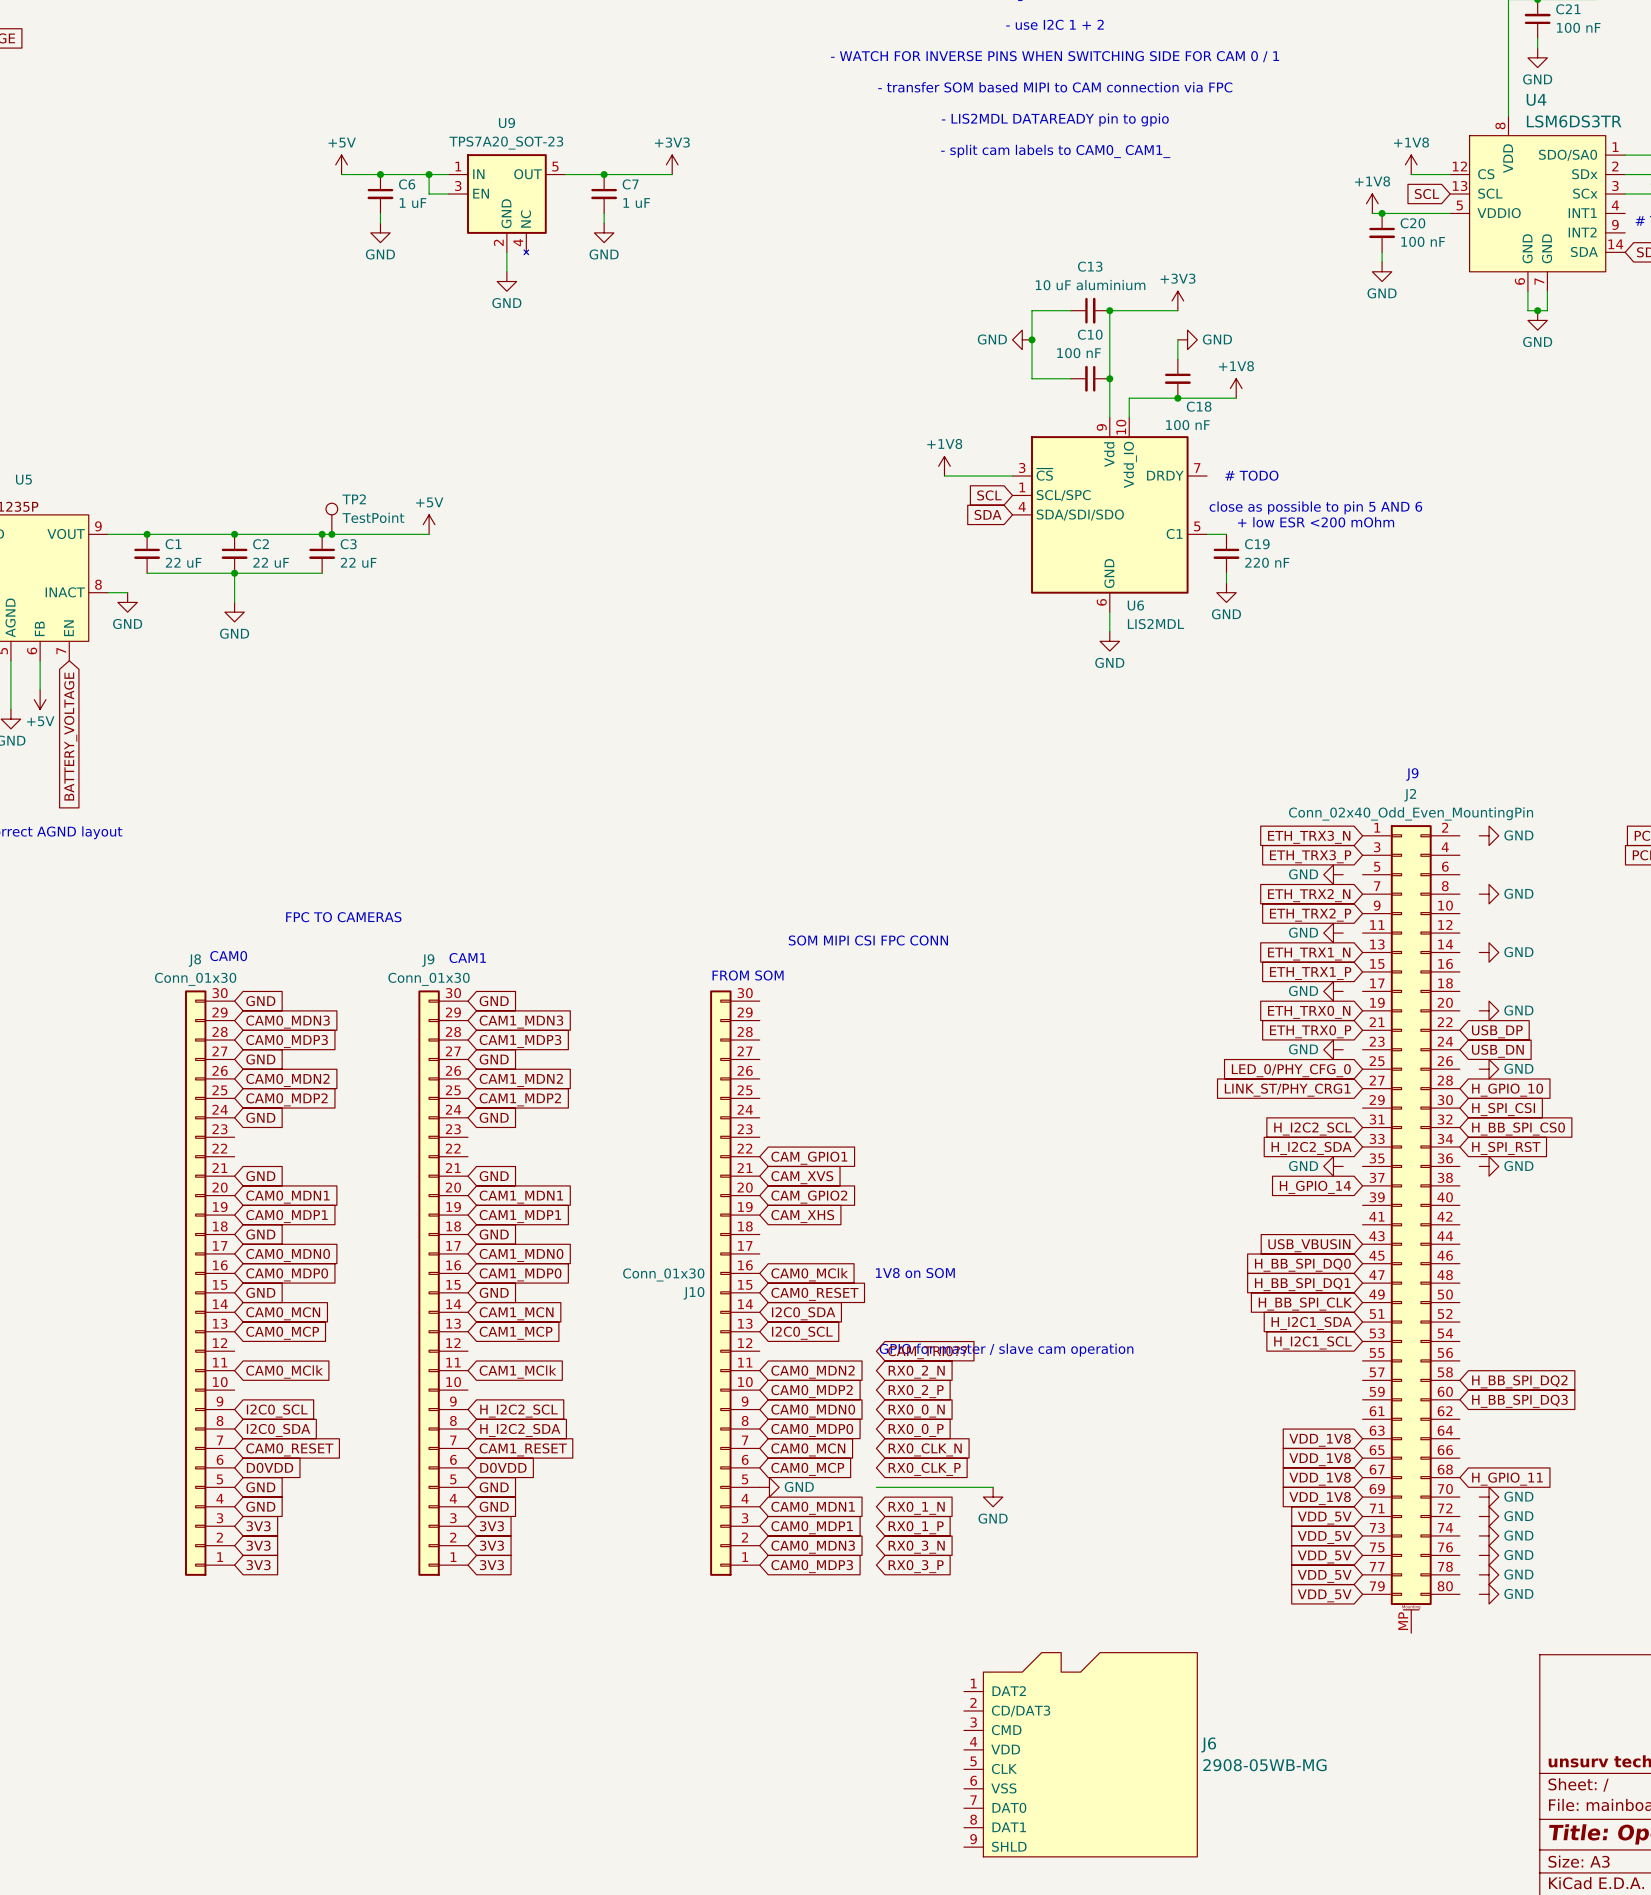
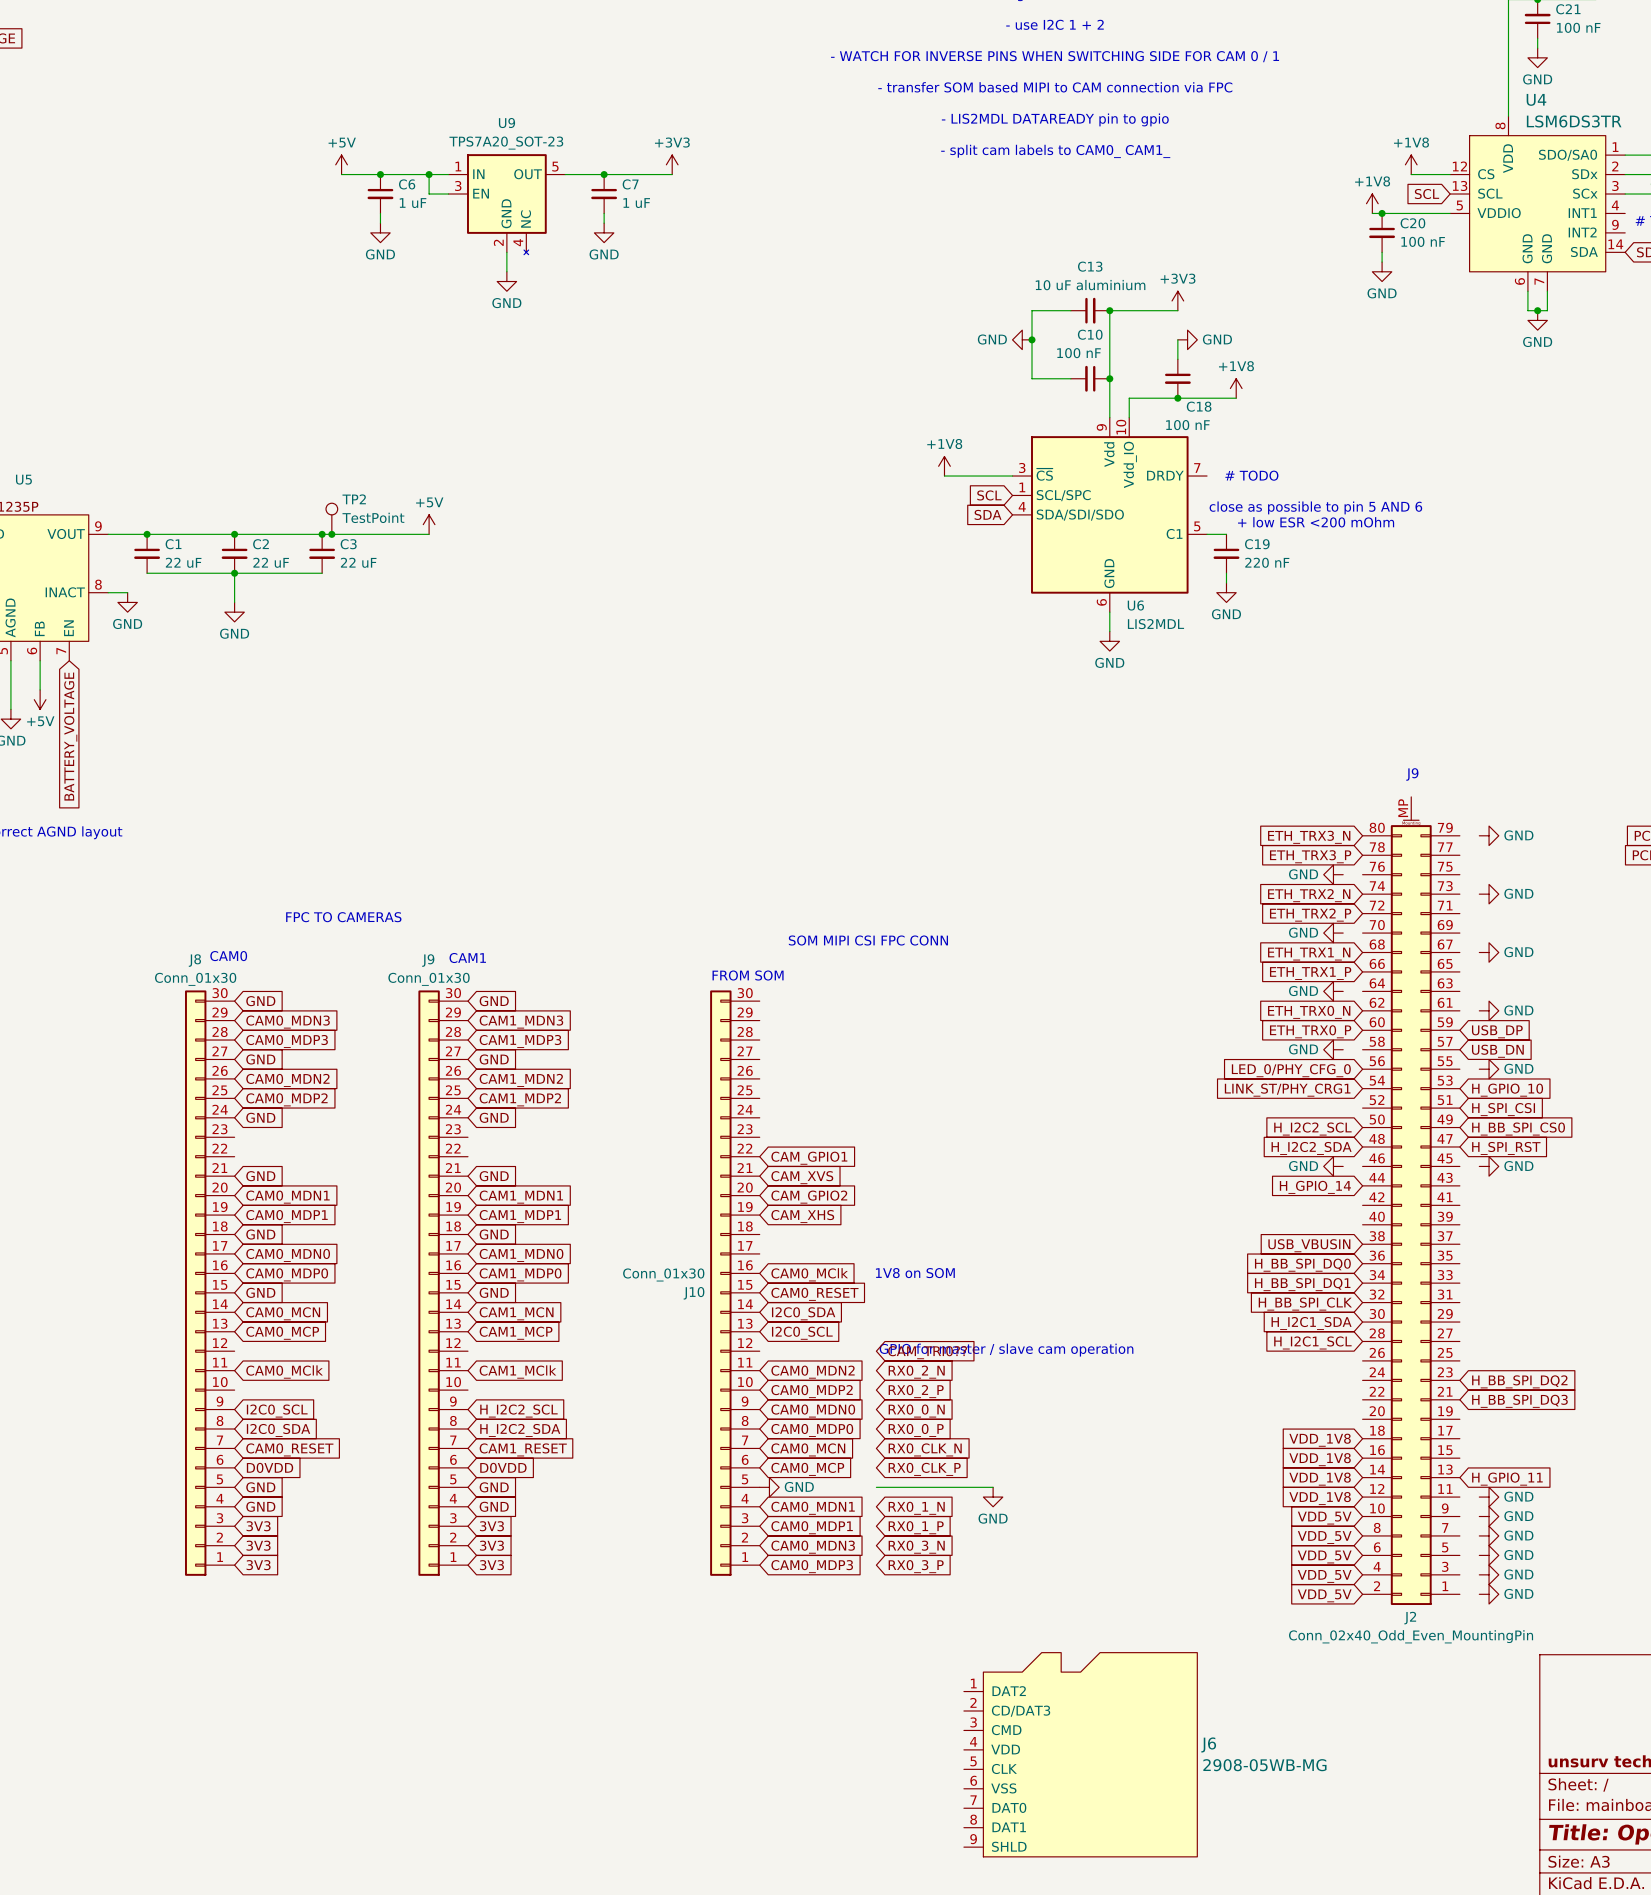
J2 name position: J2 (1410, 795) -> J2 (1410, 1618)
J2 value position: Conn_02x40_Odd_Even_MountingPin (1411, 813) -> Conn_02x40_Odd_Even_MountingPin (1411, 1636)
J2 rotation: 0° (1411, 1217) -> 180° (1411, 1212)

